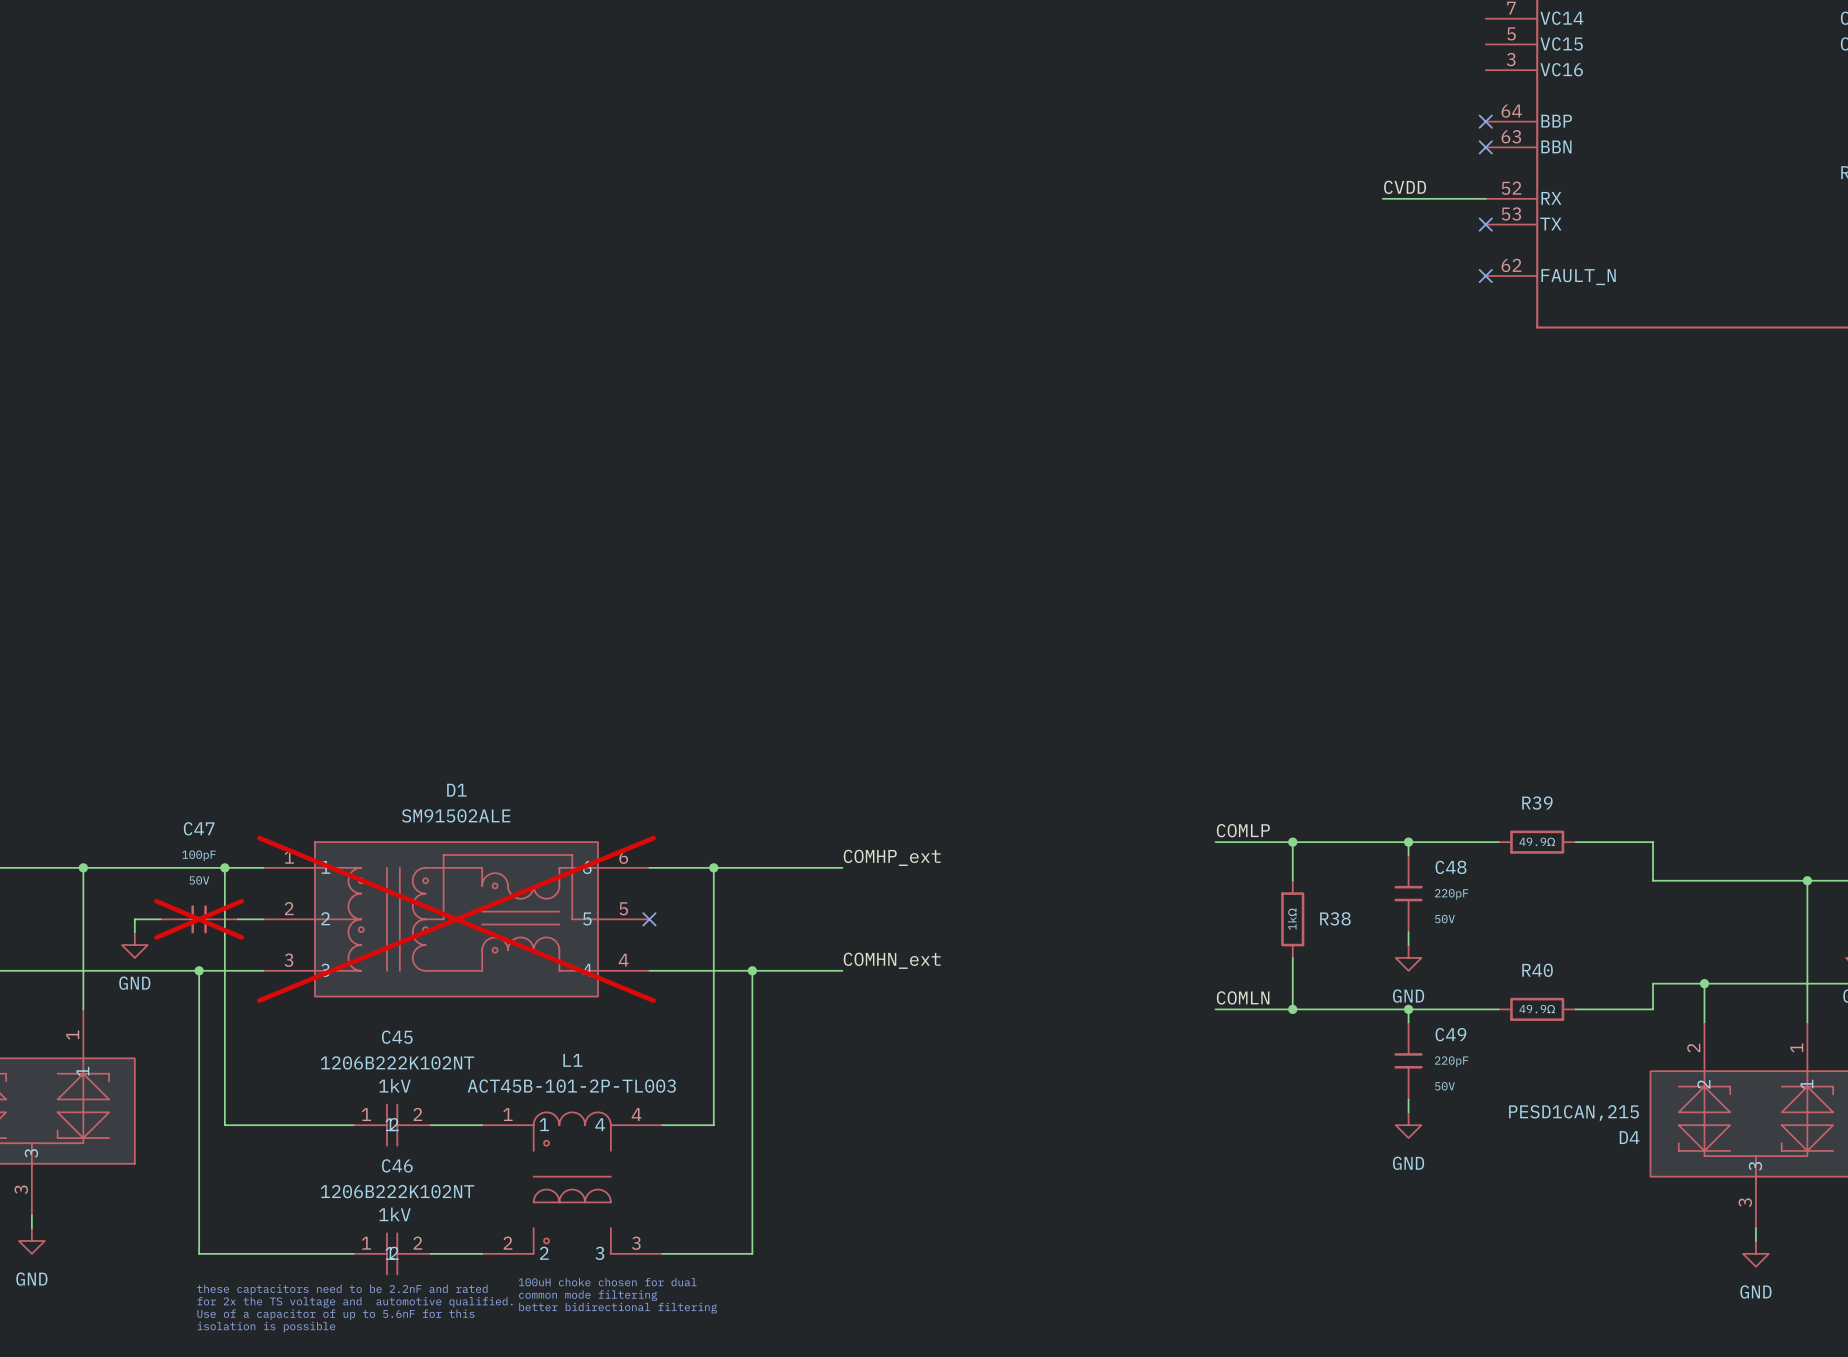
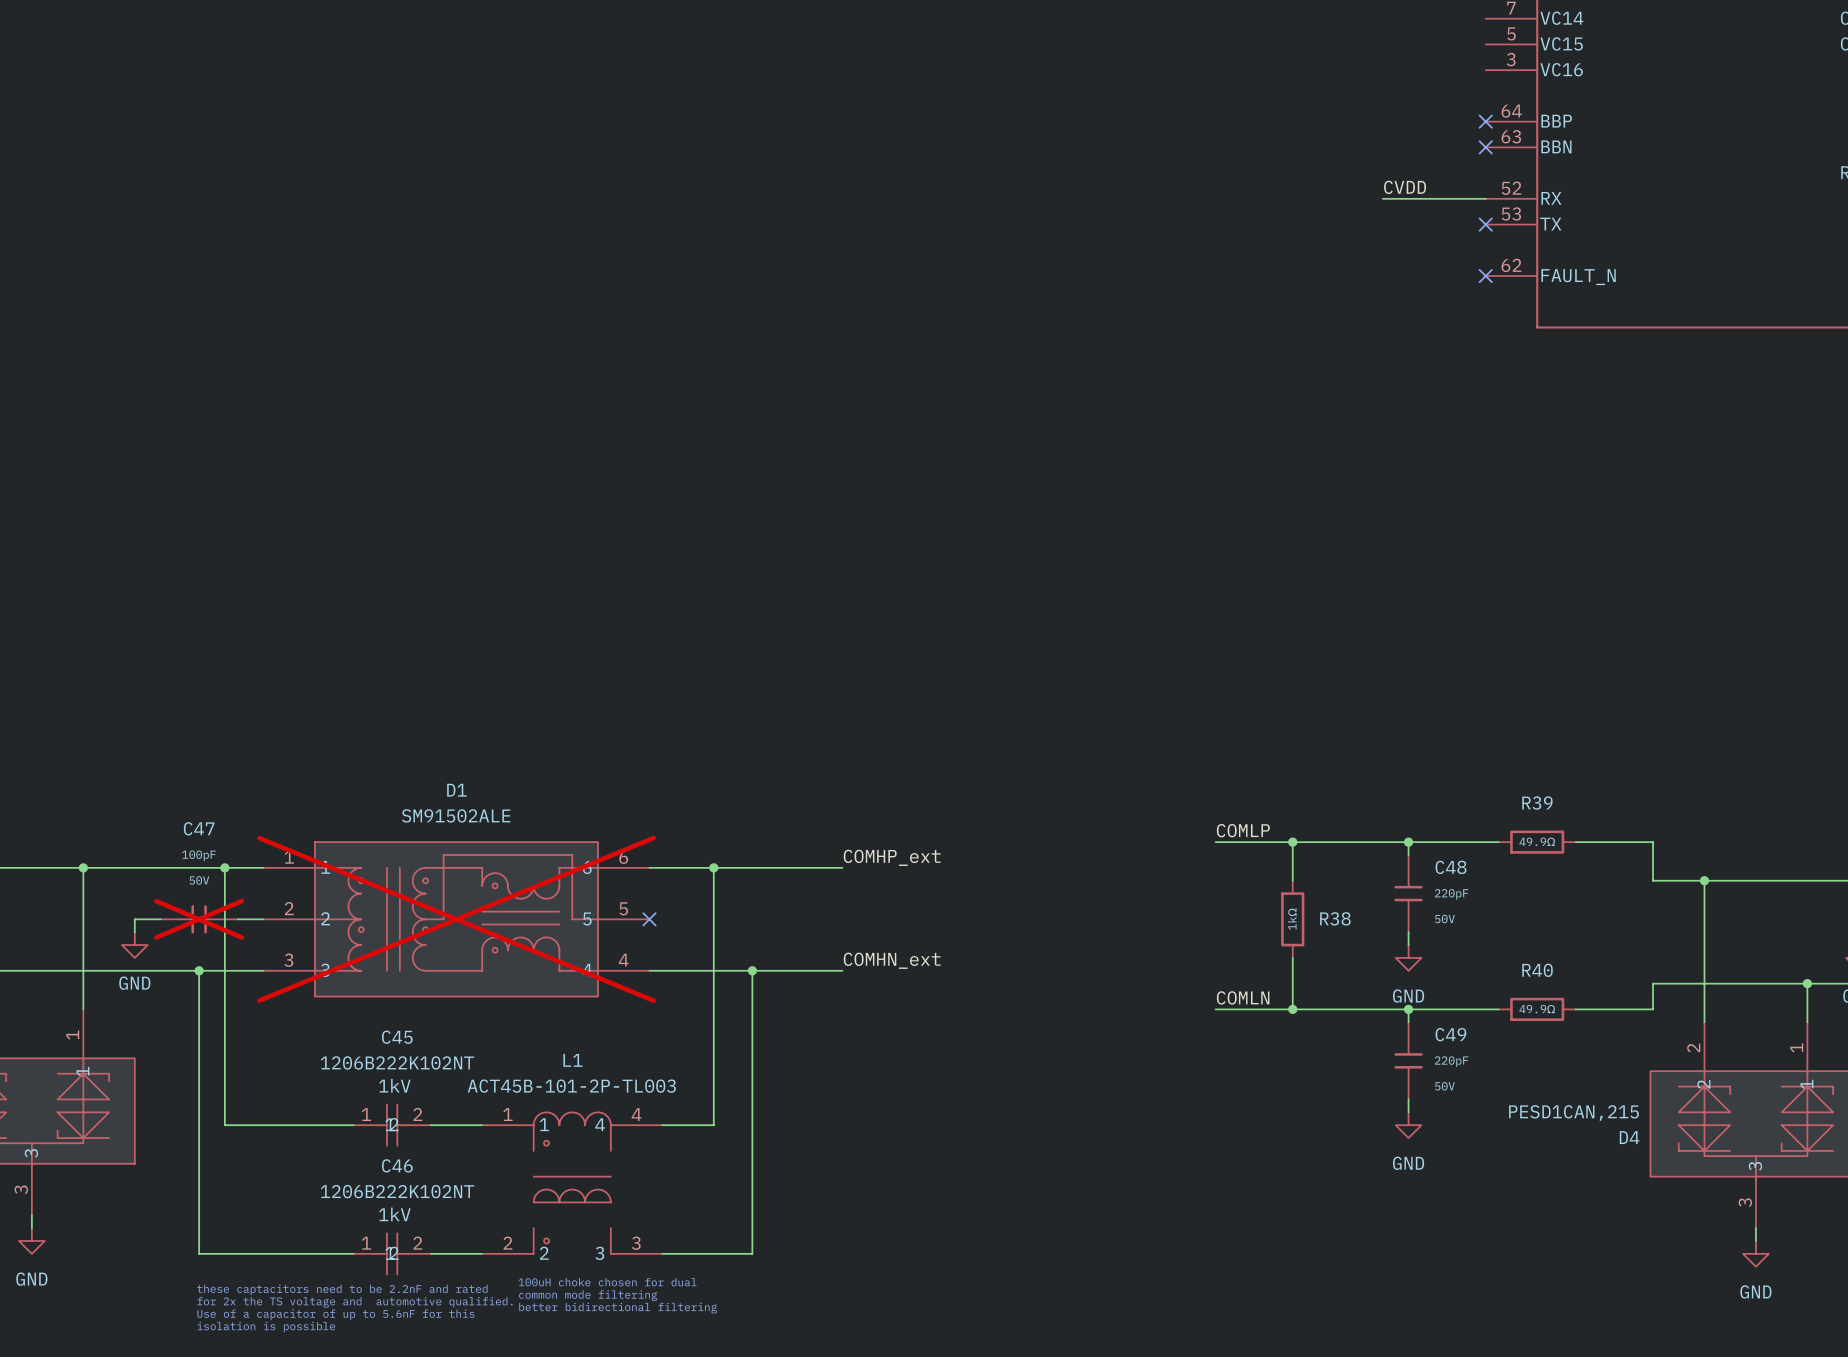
junction: none -> (1704, 880)
wire: (1807, 880) (1807, 983) -> (1704, 880) (1704, 983)
junction: (1807, 880) -> none
junction: (1704, 983) -> none
junction: none -> (1807, 983)

